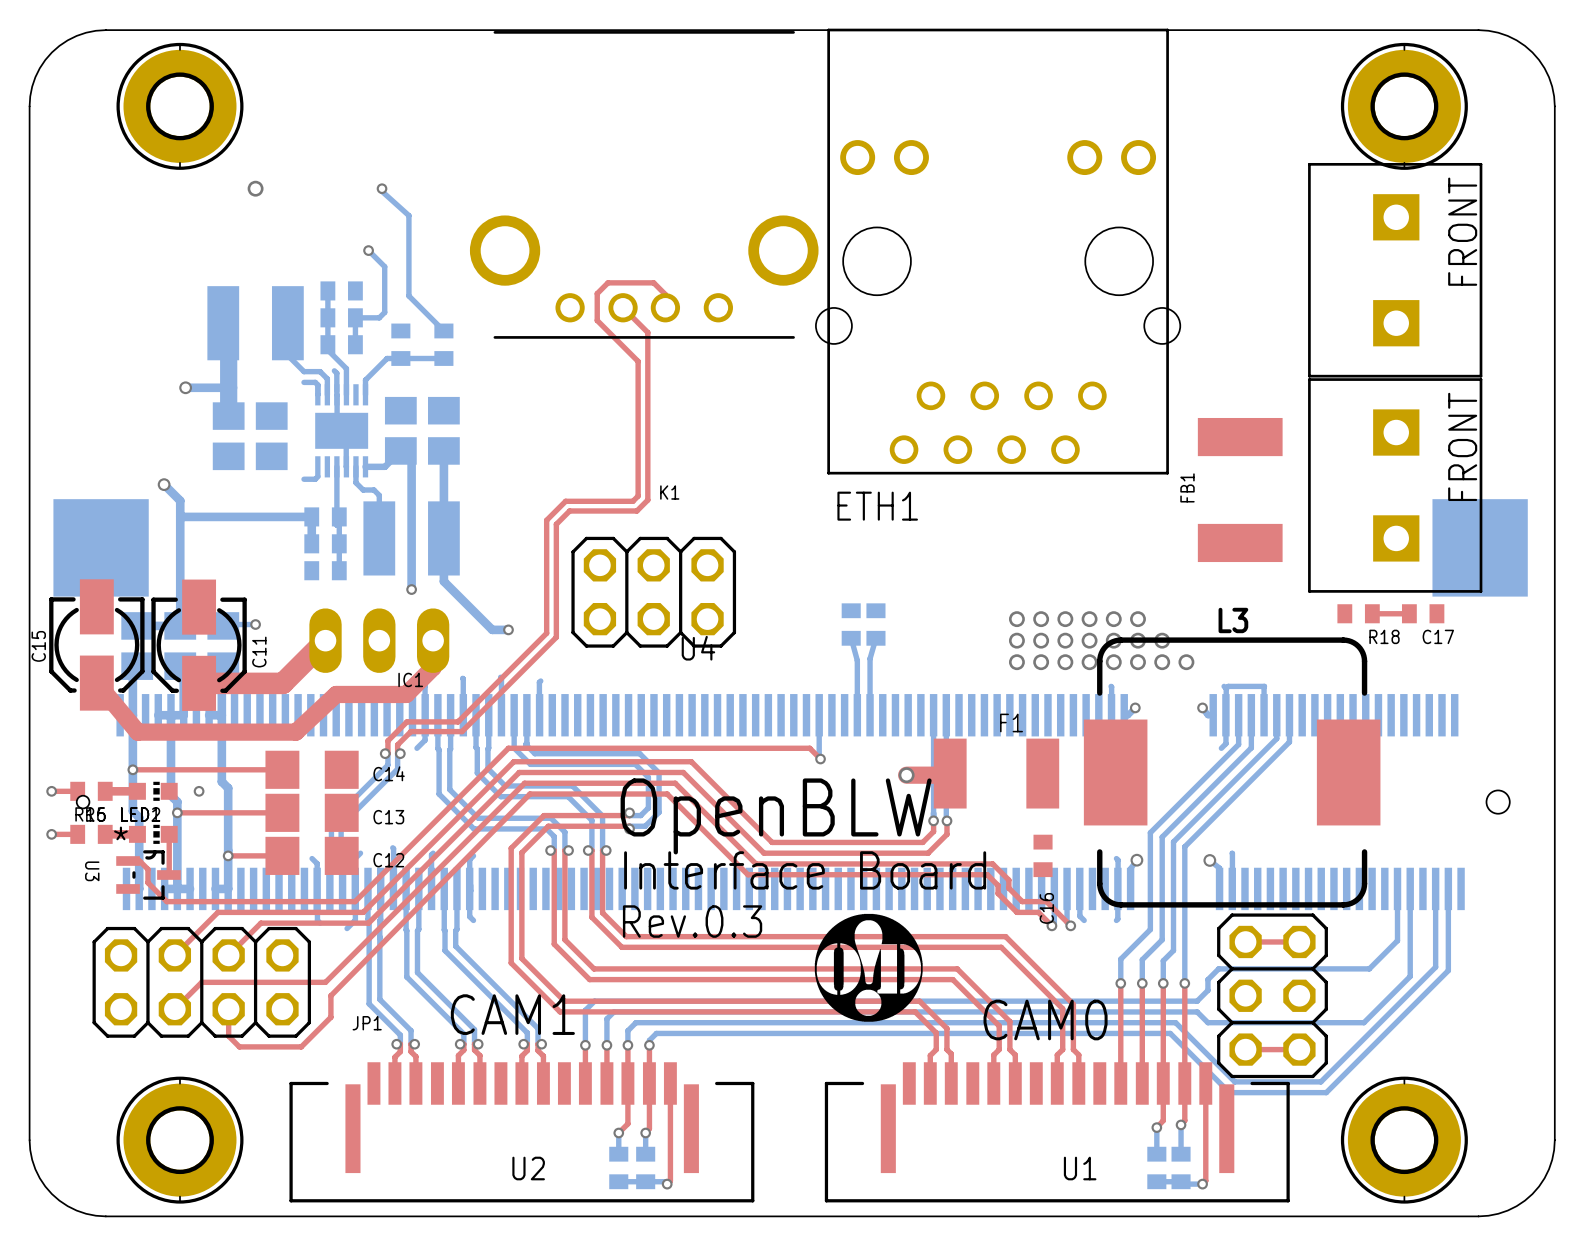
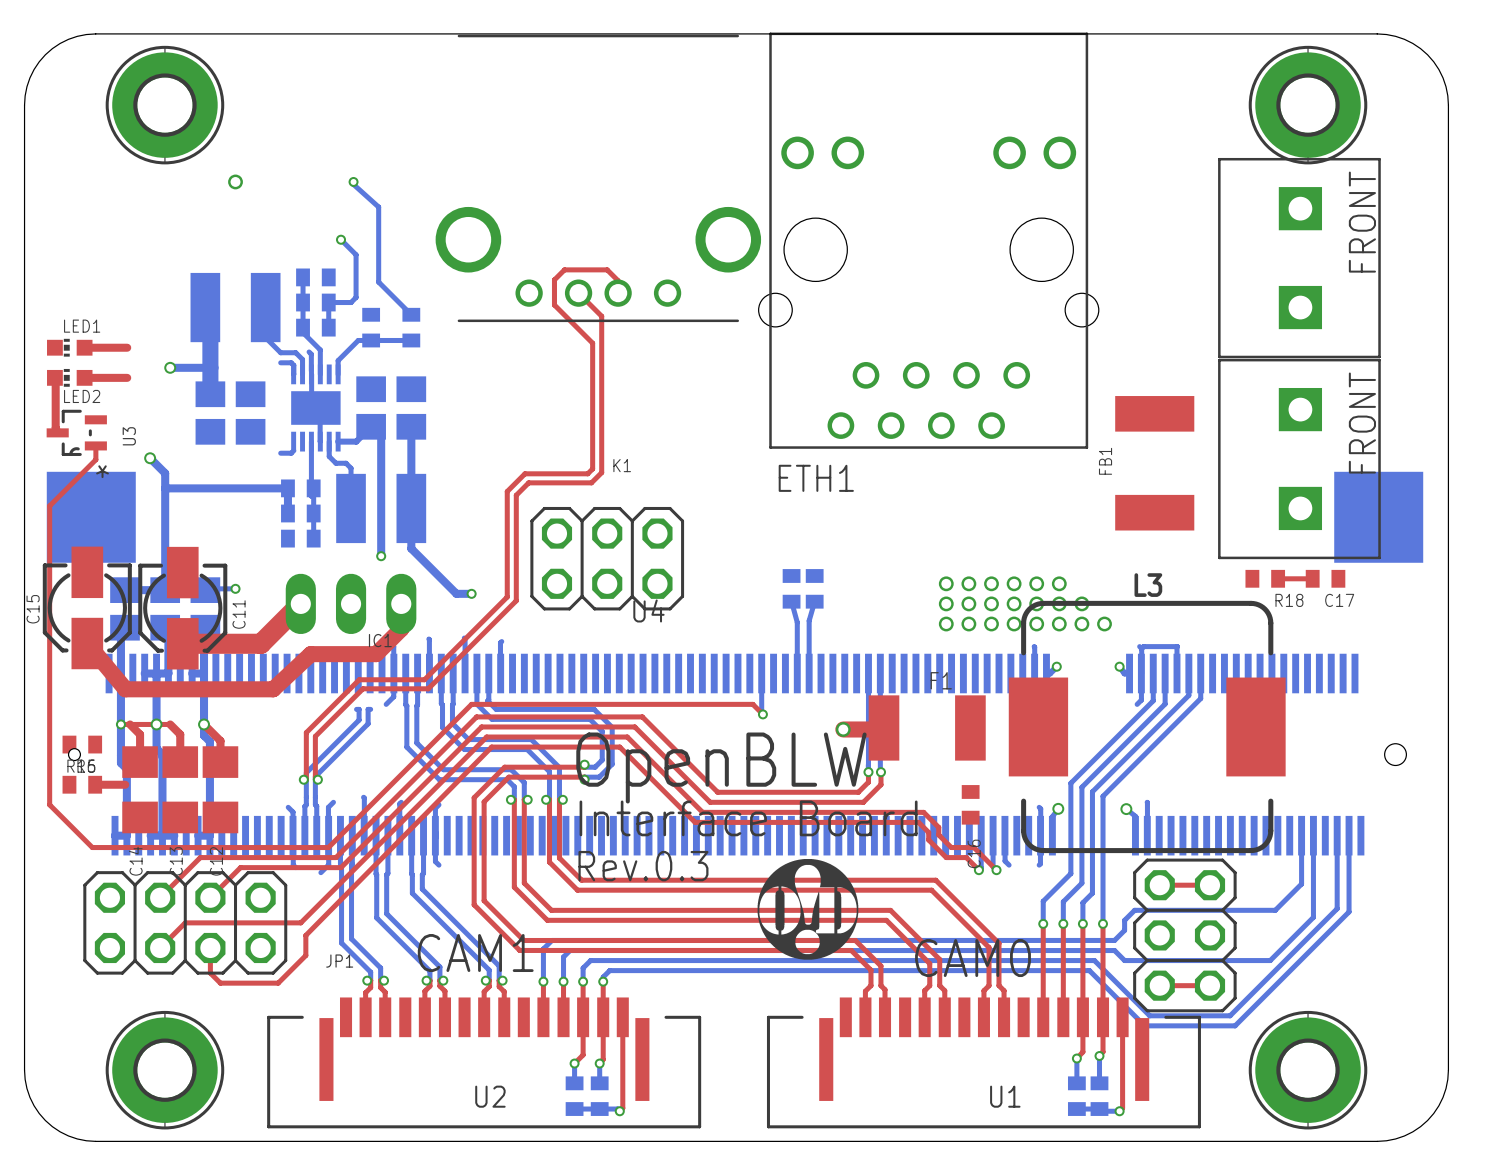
top track: none -> (84, 347) (127, 347)
top track: none -> (54, 377) (55, 428) (57, 432)
top track: none -> (84, 377) (127, 377)
top track: (406, 721) (387, 740) (387, 753) (385, 753) -> (376, 679) (359, 679) (306, 732) (306, 779) (303, 779)
top track: (410, 731) (397, 744) (397, 753) (400, 753) -> (380, 688) (362, 688) (315, 736) (315, 779) (317, 779)
via: (385, 753) -> none
via: (400, 753) -> none
top track: none -> (130, 724) (140, 734) (140, 762)
via: none -> (156, 724)
top track: (185, 769) (282, 769) -> (170, 724) (180, 734) (180, 762)
top track: none -> (204, 724) (220, 740) (220, 762)
via: none -> (204, 724)
C14 rotation: 0° (312, 769) -> 90° clockwise (140, 789)
C14 position: (312, 769) -> (140, 789)
top track: (51, 791) (77, 791) -> none
via: (51, 791) -> none
top track: (105, 791) (137, 791) -> none
LED1 rotation: 0° (153, 791) -> 180° (69, 347)
LED1 position: (153, 791) -> (69, 347)
via: (199, 791) -> none
top track: (177, 812) (282, 812) -> none
via: (177, 812) -> none
C13 rotation: 0° (312, 812) -> 90° clockwise (180, 789)
C13 position: (312, 812) -> (180, 789)
via: none -> (303, 779)
via: none -> (317, 779)
top track: (51, 834) (77, 834) -> none
via: (51, 834) -> none
LED2 rotation: 0° (153, 834) -> 180° (69, 377)
LED2 position: (153, 834) -> (69, 377)
top track: (169, 834) (169, 874) -> none
top track: (228, 855) (282, 855) -> none
via: (228, 855) -> none
C12 rotation: 0° (312, 855) -> 90° clockwise (220, 789)
C12 position: (312, 855) -> (220, 789)
top track: (128, 861) (139, 861) (147, 869) (147, 882) (166, 901) -> (95, 445) (95, 459) (49, 505) (49, 804) (92, 847) (152, 847)
U3 rotation: 0° (148, 874) -> 180° (76, 432)
U3 position: (148, 874) -> (76, 432)

